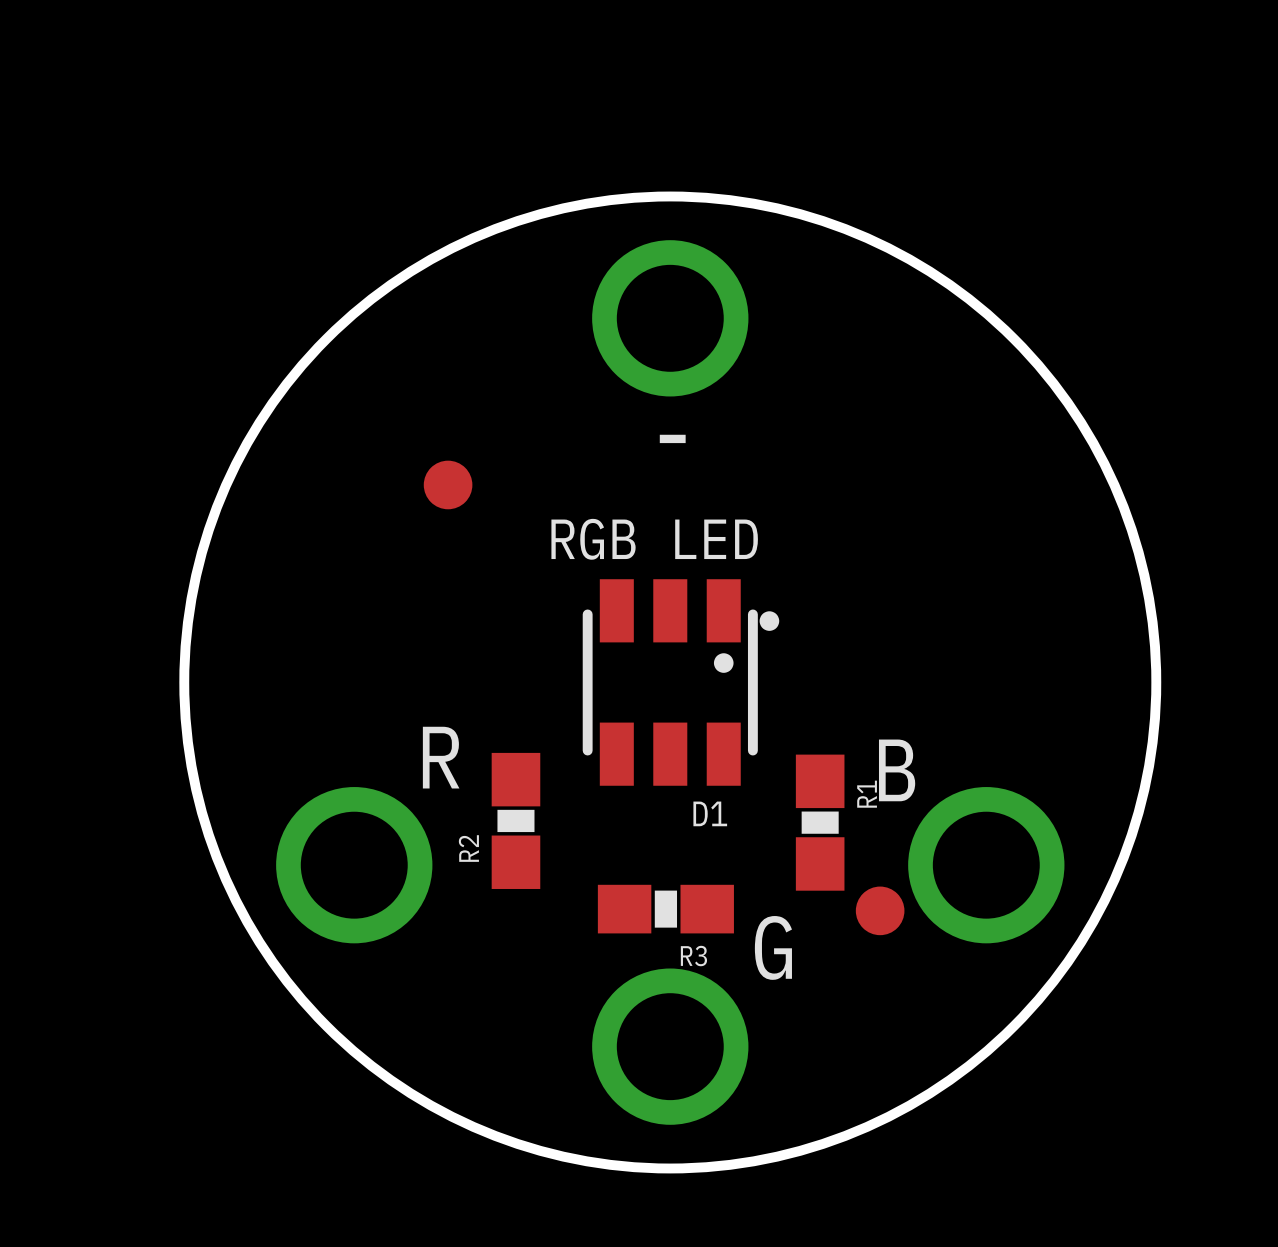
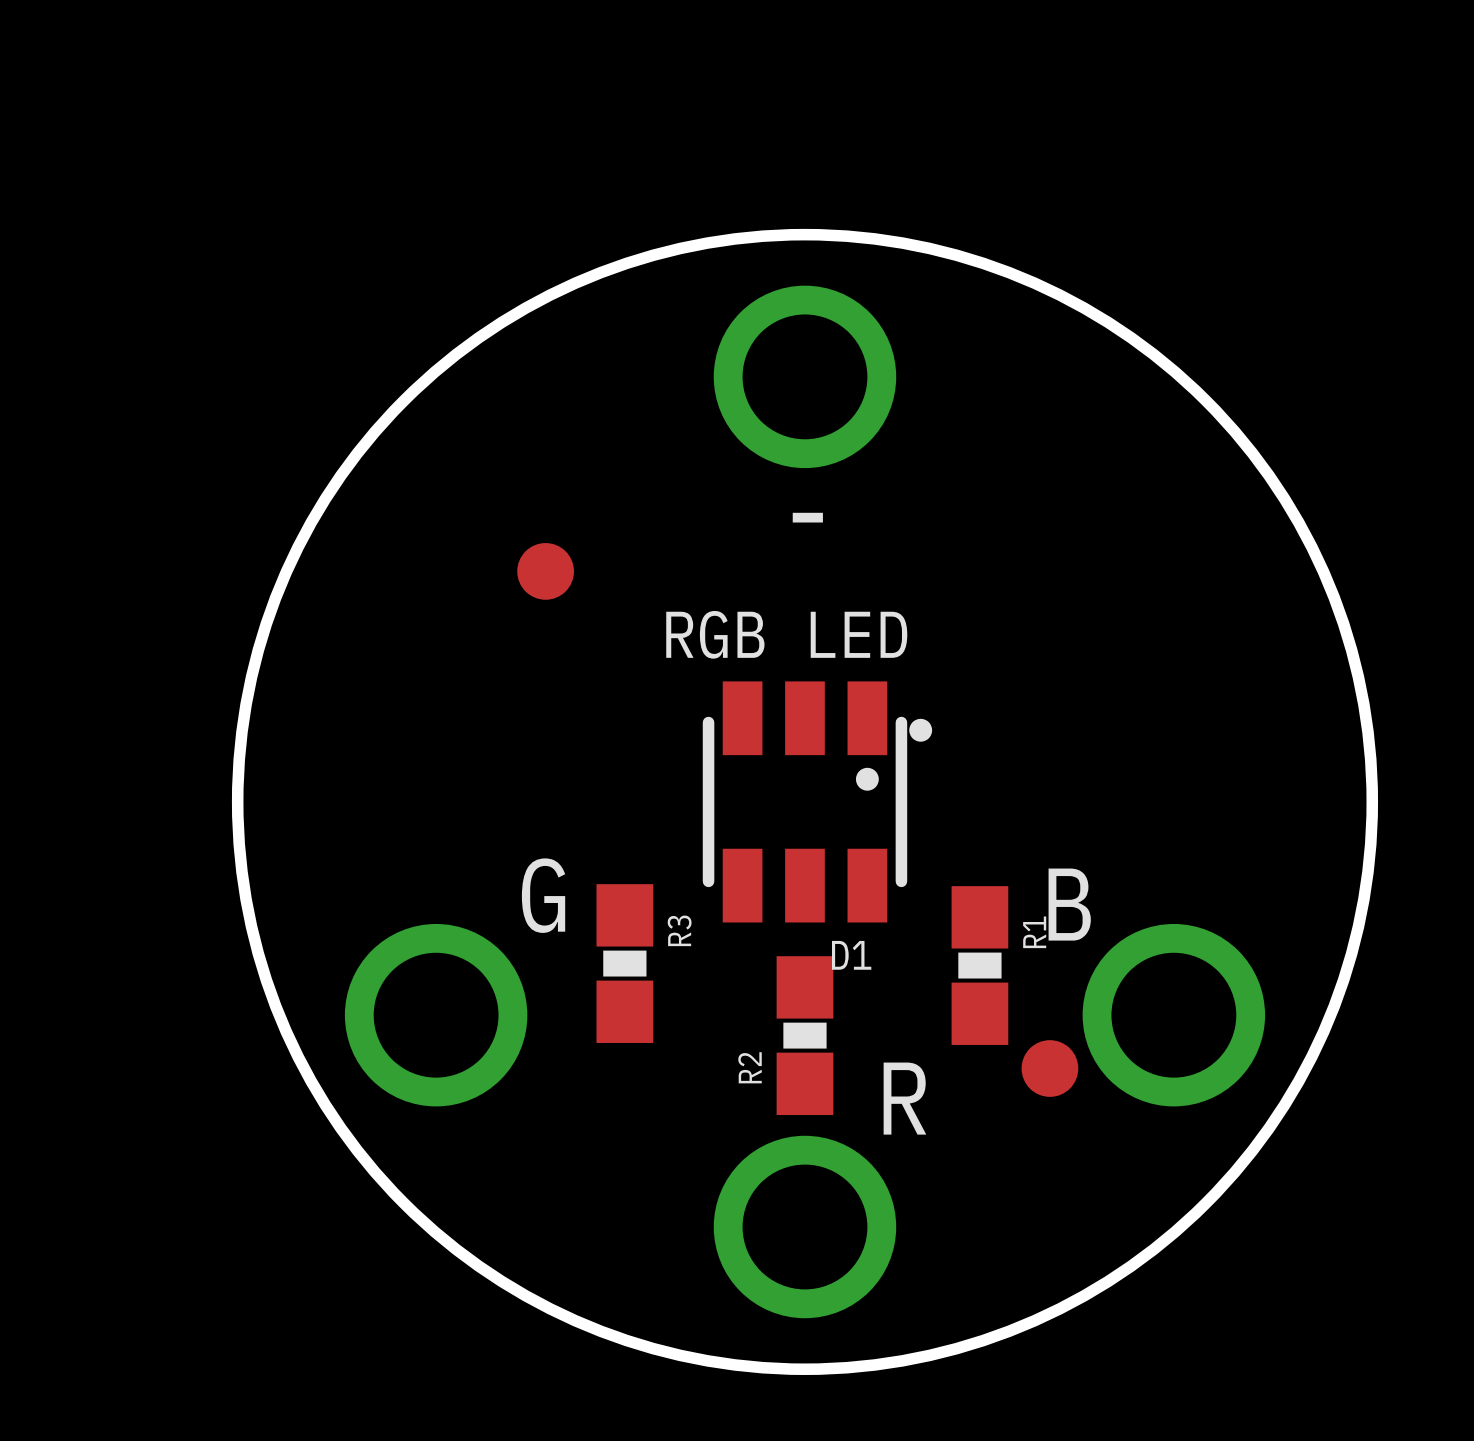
text: R (441, 757) -> G (543, 895)
R2 name: R2 (468, 848) -> R3 (679, 930)
R2: none -> (804, 1035)
R3: (665, 909) -> none
text: G (773, 947) -> R (904, 1098)

